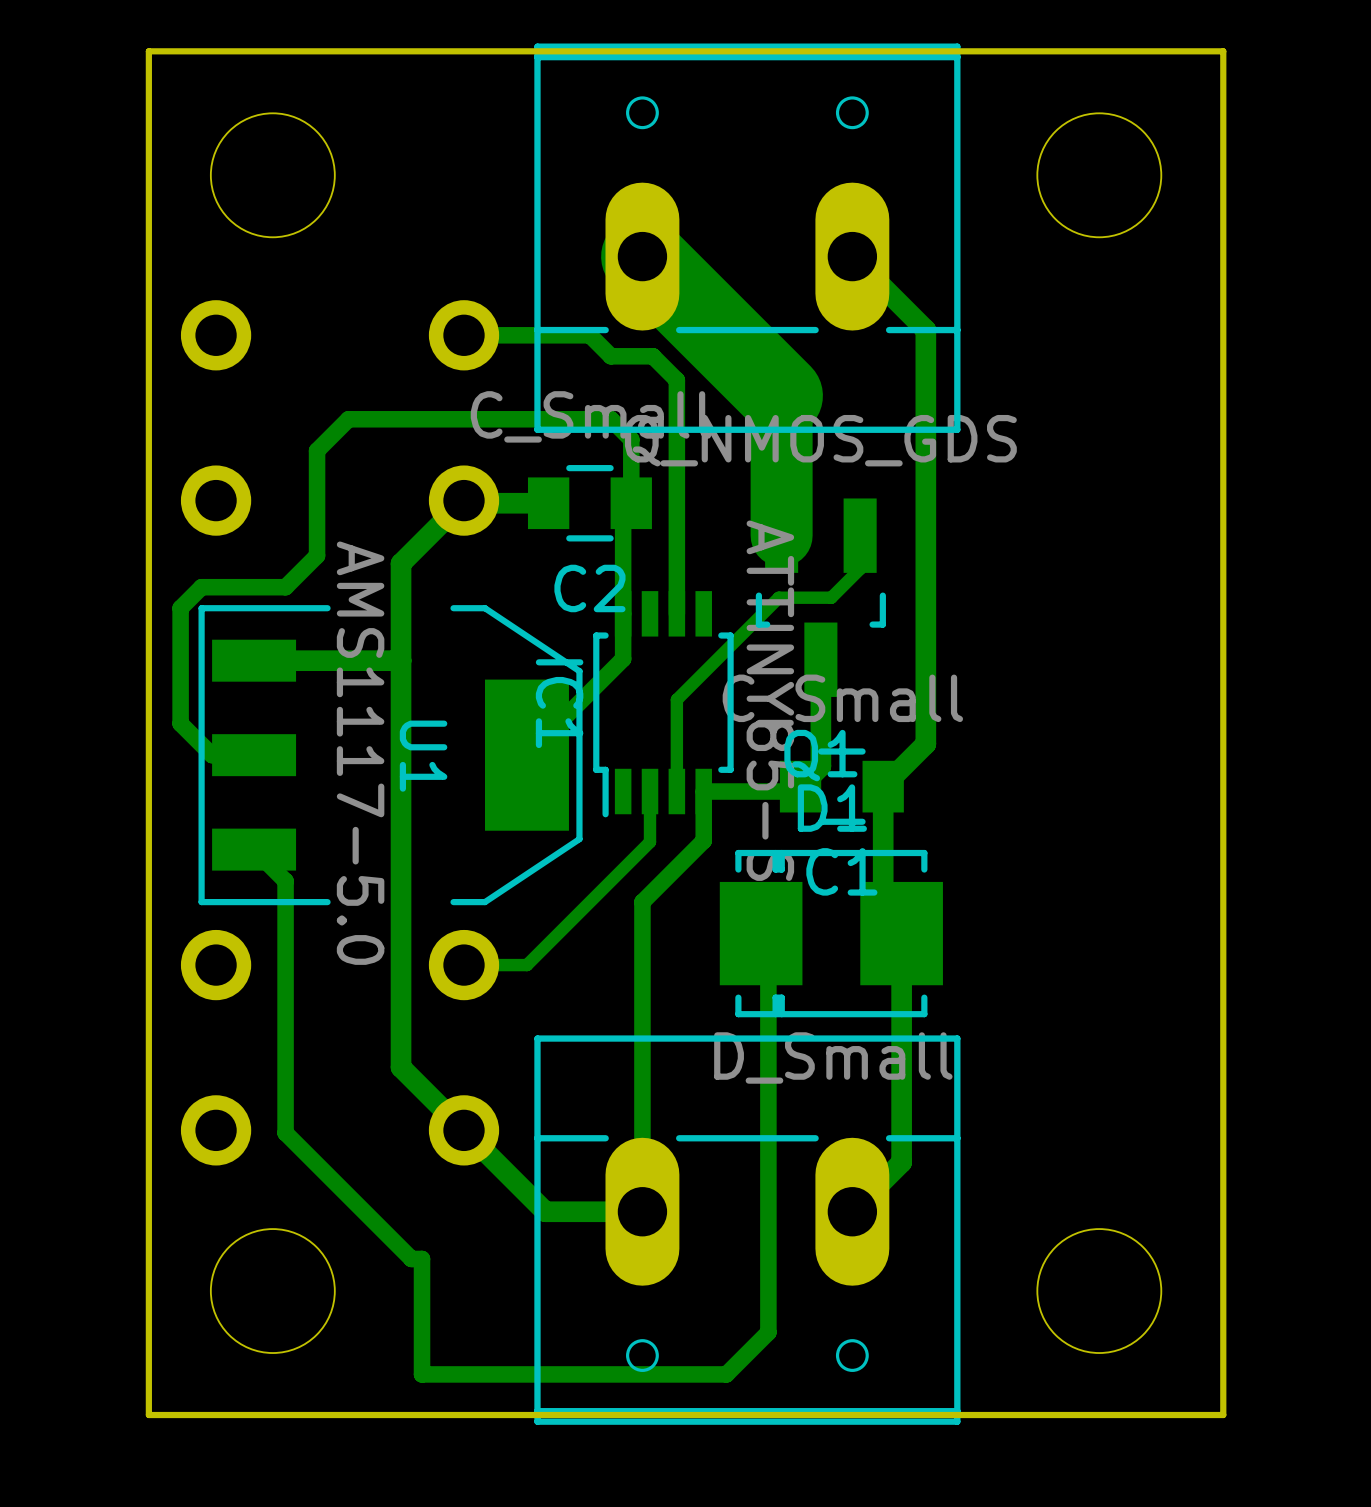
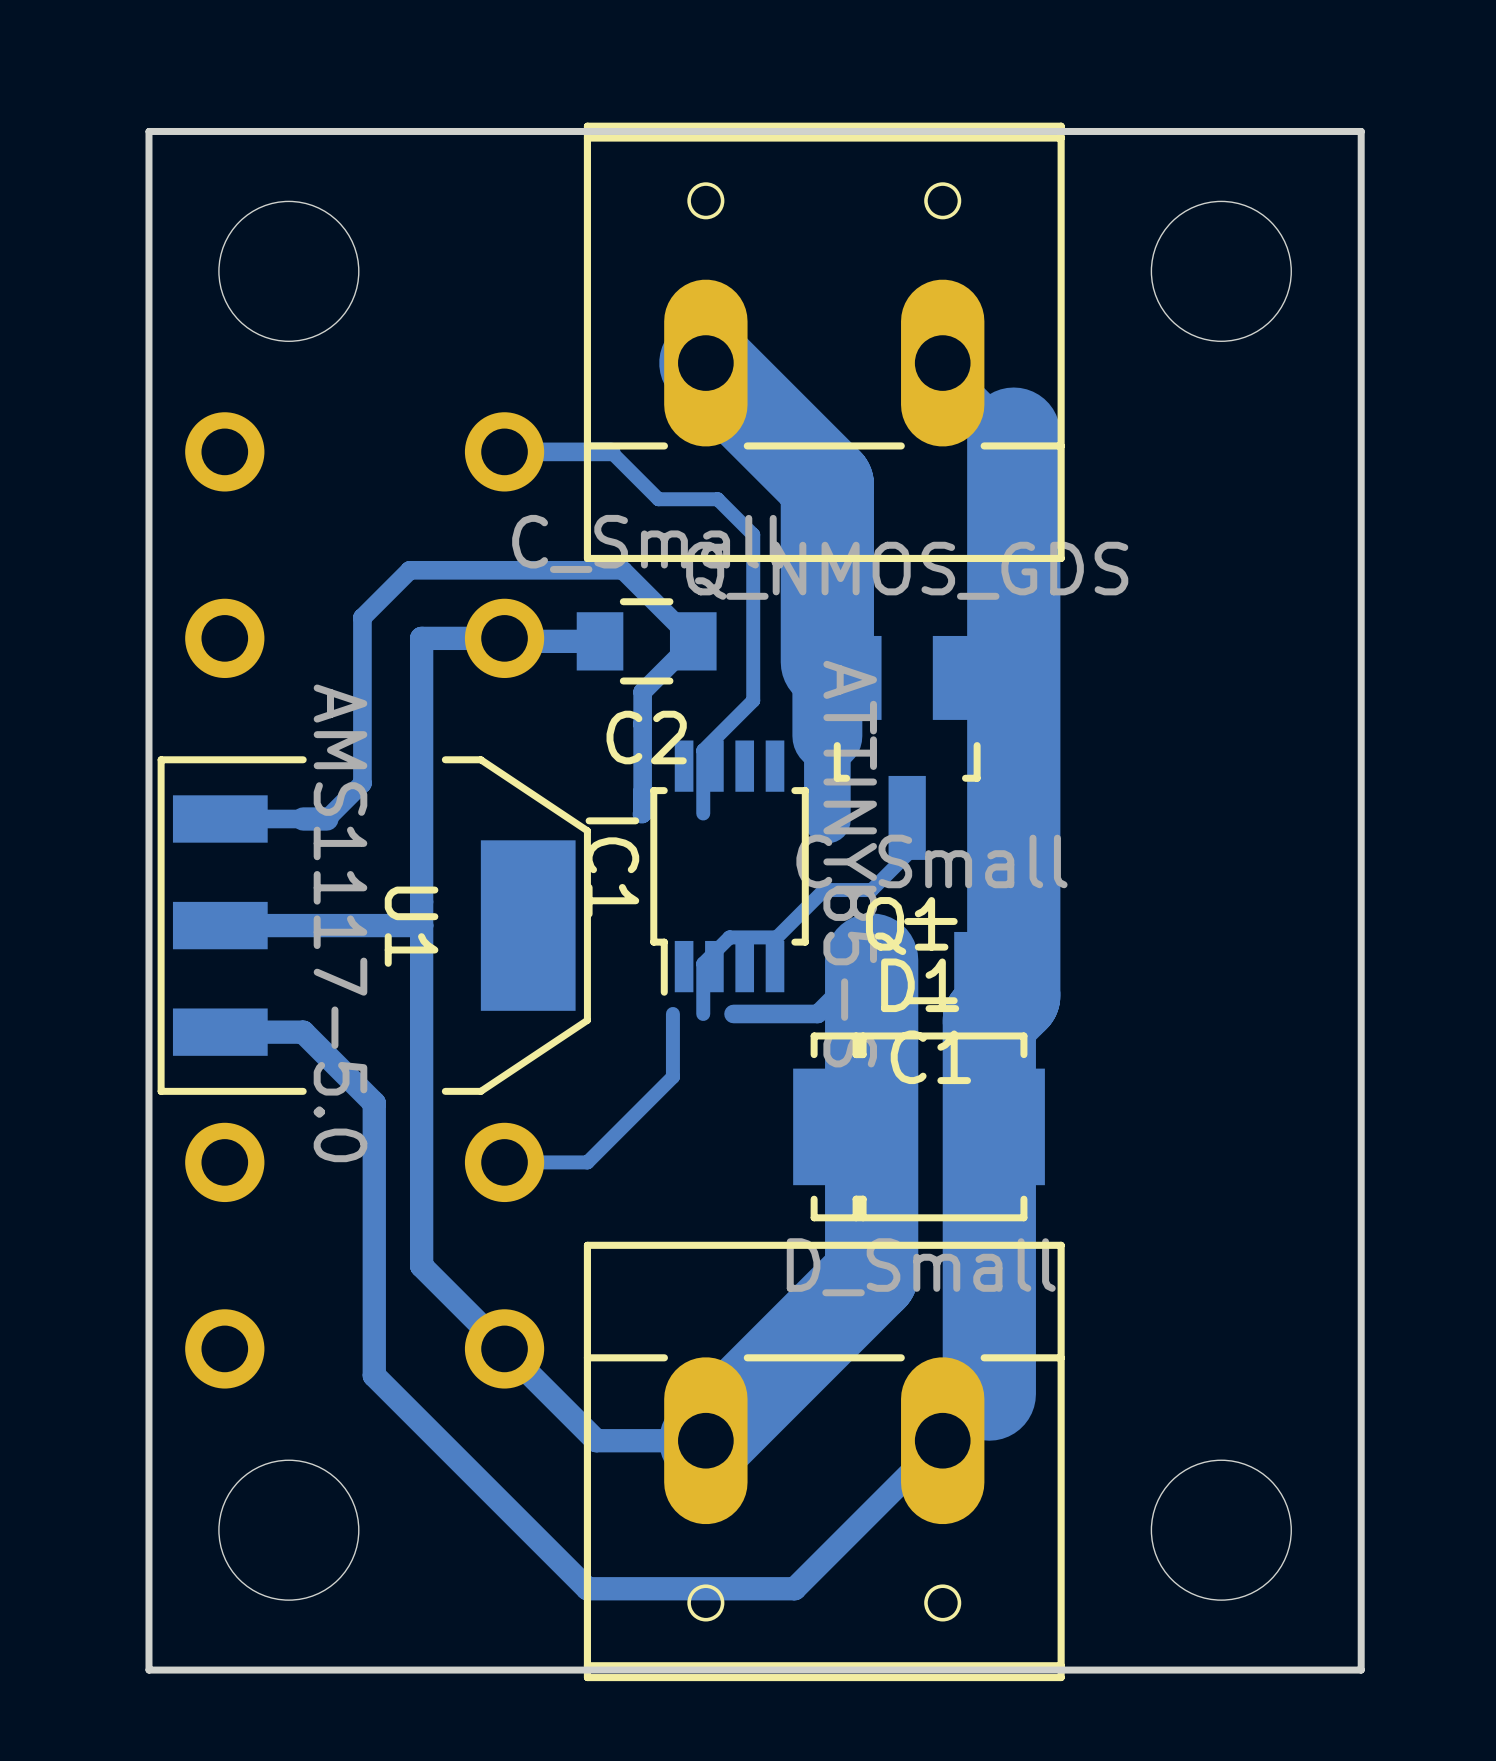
bottom track: (915, 319) (925, 330) (925, 743) (883, 786) (883, 915) (901, 933) (901, 1162) (893, 1170) -> (1013, 434) (1013, 995) (989, 1020) (989, 1394)
bottom track: (558, 335) (589, 335) (610, 356) (652, 356) (676, 380) (676, 613) -> (611, 451) (658, 499) (717, 499) (753, 534) (753, 700) (703, 750) (703, 813)
bottom track: (750, 364) (781, 395) (781, 535) -> (827, 484) (827, 820)
bottom track: (464, 500) (401, 563) (401, 1067) -> (504, 638) (421, 638) (421, 1266) (433, 1277)
bottom track: (631, 502) (631, 439) (610, 419) (348, 419) (317, 450) (317, 555) (285, 587) (201, 587) (180, 608) (180, 723) (212, 755) -> (693, 640) (622, 570) (409, 570) (362, 617) (362, 783) (326, 818)
bottom track: (623, 511) (623, 658) (526, 755) -> (684, 650) (642, 691) (641, 814)
bottom track: (860, 535) (860, 568) (831, 597) (778, 597) (676, 699) (676, 791) -> none
bottom track: (820, 659) (820, 766) (795, 791) (703, 791) (703, 840) (642, 902) (642, 1211) -> (871, 960) (871, 1274) (705, 1440)
bottom track: (401, 660) (306, 660) -> none
bottom track: none -> (915, 820) (915, 845) (871, 890) (824, 890) (776, 937) (729, 937) (703, 963) (703, 1013)
bottom track: none -> (421, 925) (267, 925)
U1 position: (390, 755) -> (374, 925)
bottom track: none -> (871, 960) (817, 1013) (733, 1013)
bottom track: (650, 791) (650, 842) (526, 965) -> (672, 1013) (672, 1076) (587, 1162) (575, 1162)
bottom track: none -> (220, 1032) (303, 1032) (374, 1103) (374, 1375) (587, 1588) (794, 1588) (942, 1440)
bottom track: (254, 849) (285, 881) (285, 1133) (411, 1258) (422, 1258) (422, 1374) (726, 1374) (768, 1332) (768, 940) (761, 933) -> none

